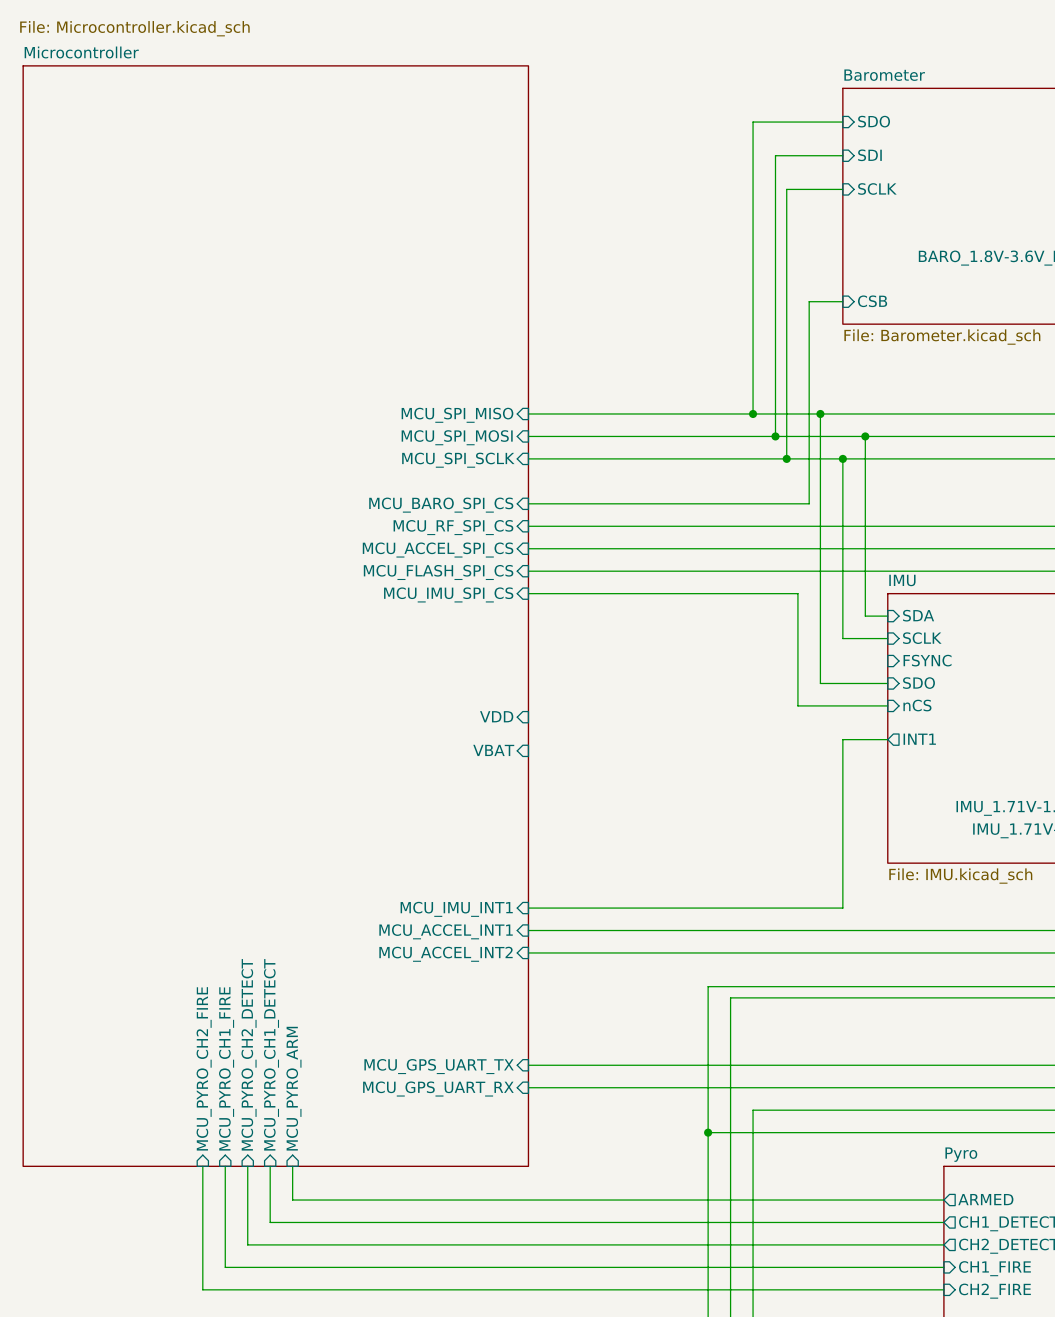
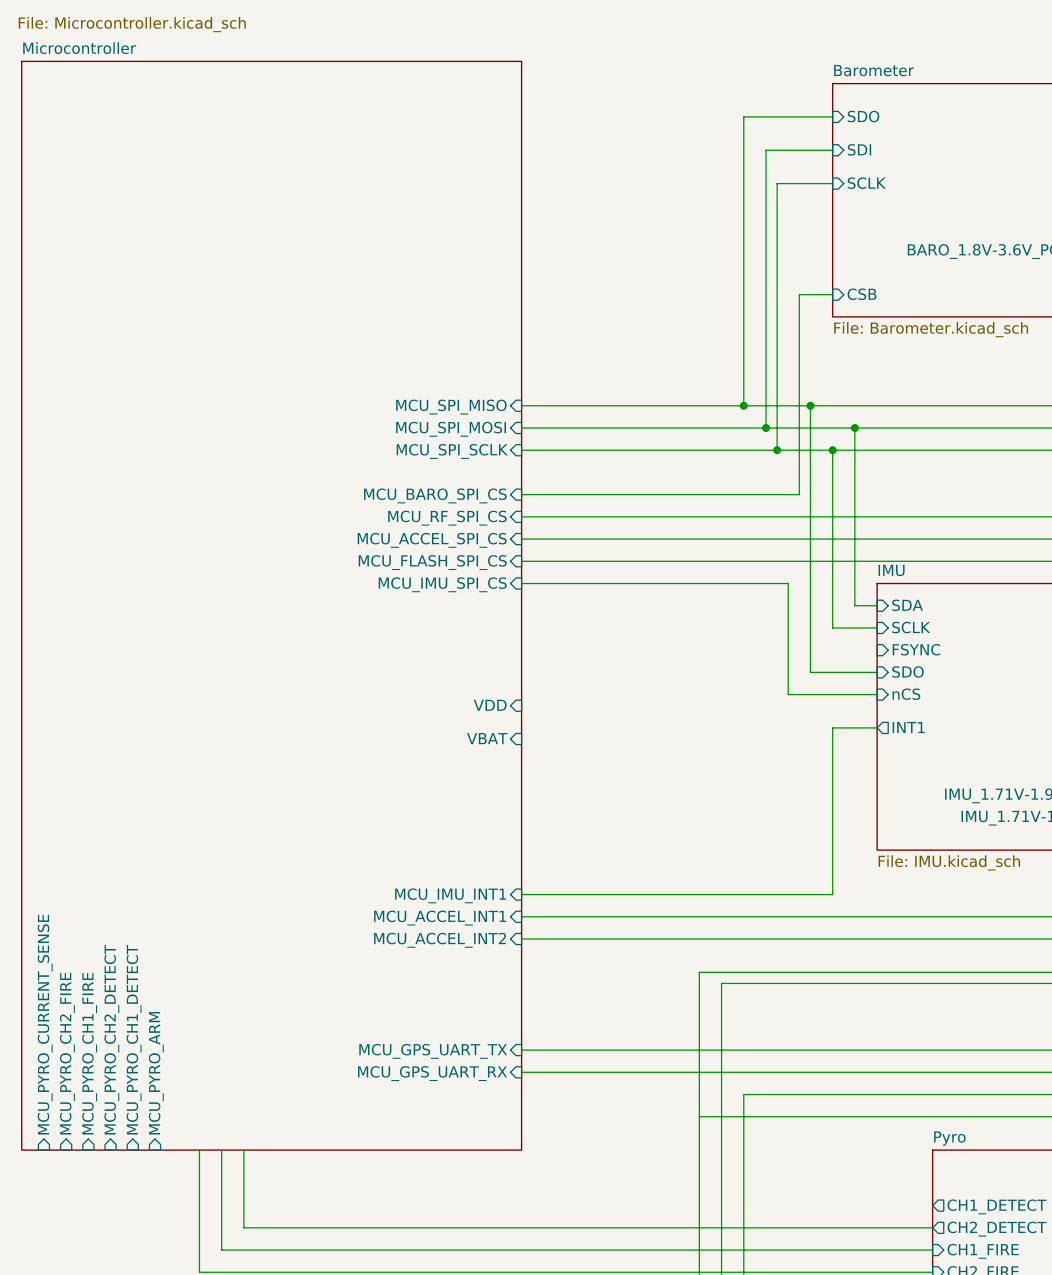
sheet pin: none -> MCU_PYRO_CURRENT_SENSE (45, 1024)
sheet pin position: MCU_PYRO_CH2_DETECT (249, 1054) -> MCU_PYRO_CH2_DETECT (111, 1039)
sheet pin position: MCU_PYRO_CH1_DETECT (271, 1054) -> MCU_PYRO_CH1_DETECT (134, 1039)
sheet pin position: MCU_PYRO_CH2_FIRE (204, 1068) -> MCU_PYRO_CH2_FIRE (67, 1053)
sheet pin position: MCU_PYRO_CH1_FIRE (226, 1068) -> MCU_PYRO_CH1_FIRE (89, 1053)
sheet pin position: MCU_PYRO_ARM (293, 1088) -> MCU_PYRO_ARM (156, 1073)
junction: (708, 1132) -> none
wire: (270, 1166) (270, 1222) (943, 1222) -> none
wire: (292, 1166) (292, 1200) (943, 1200) -> none
sheet pin: ARMED (985, 1199) -> none

